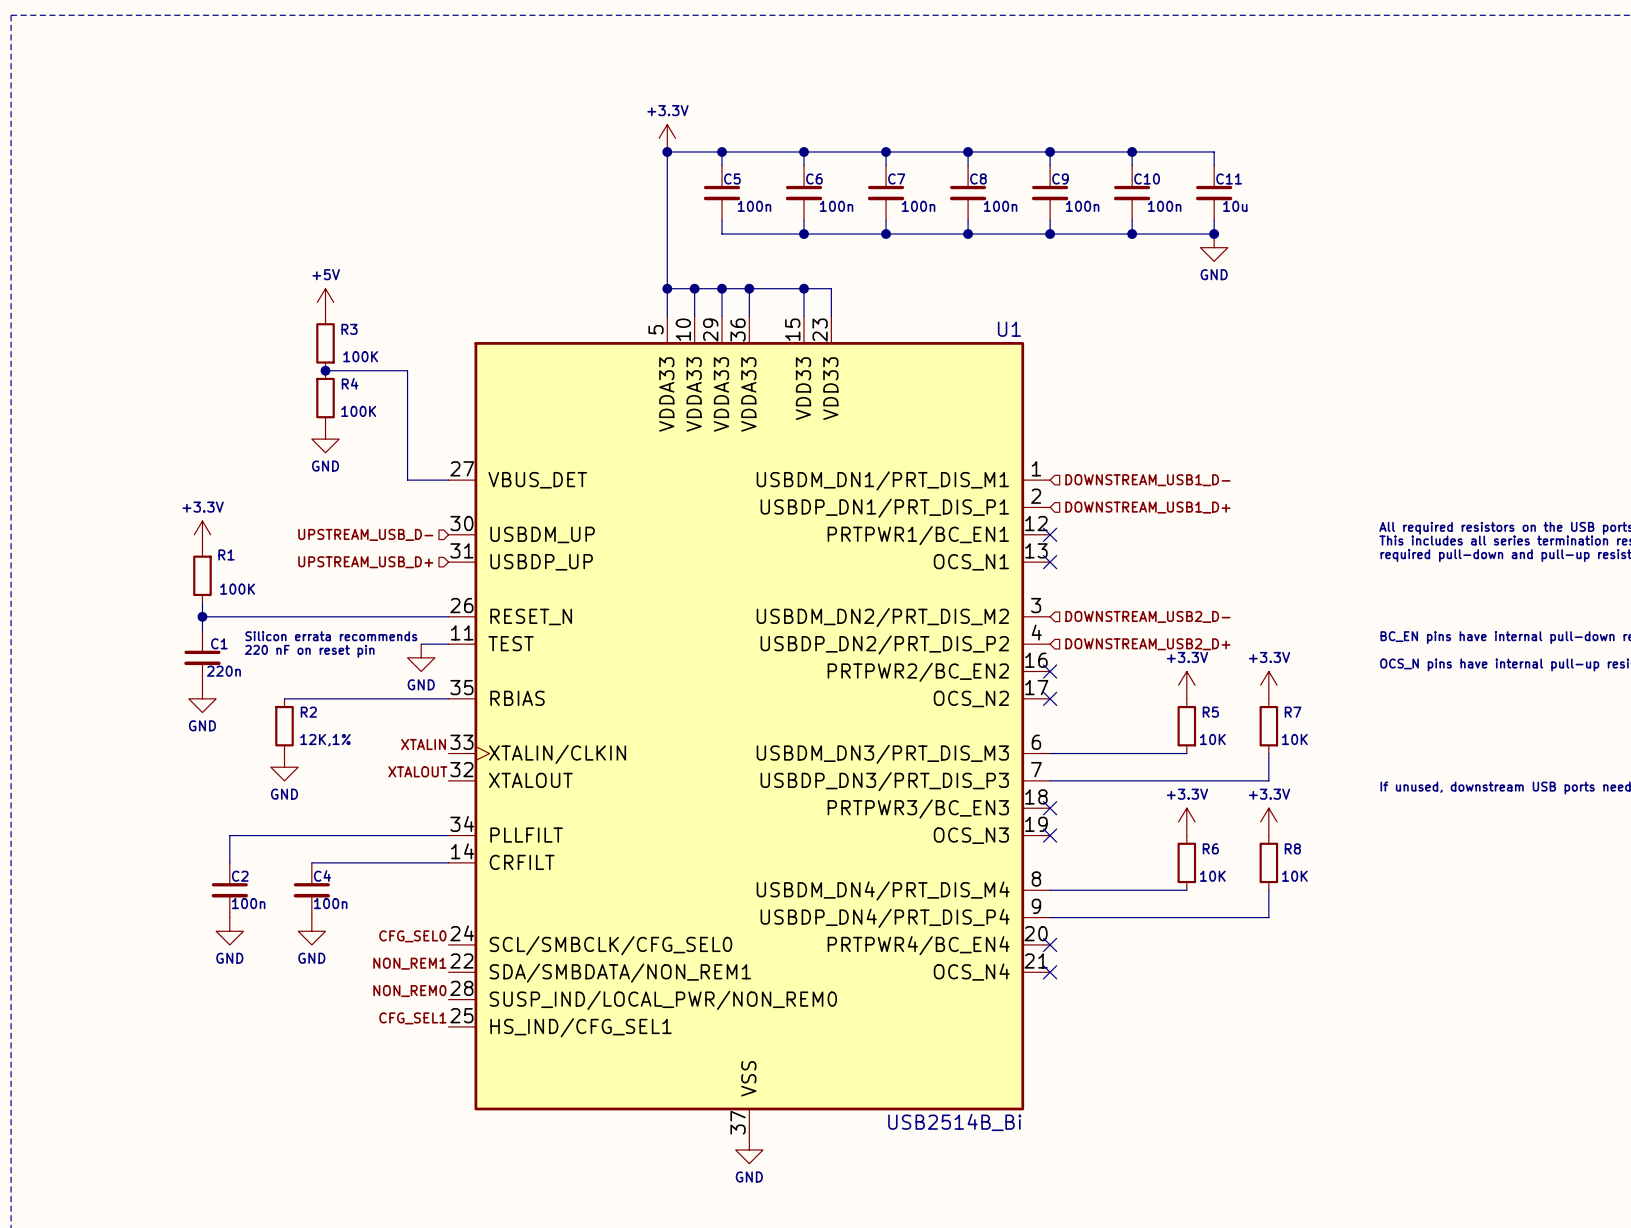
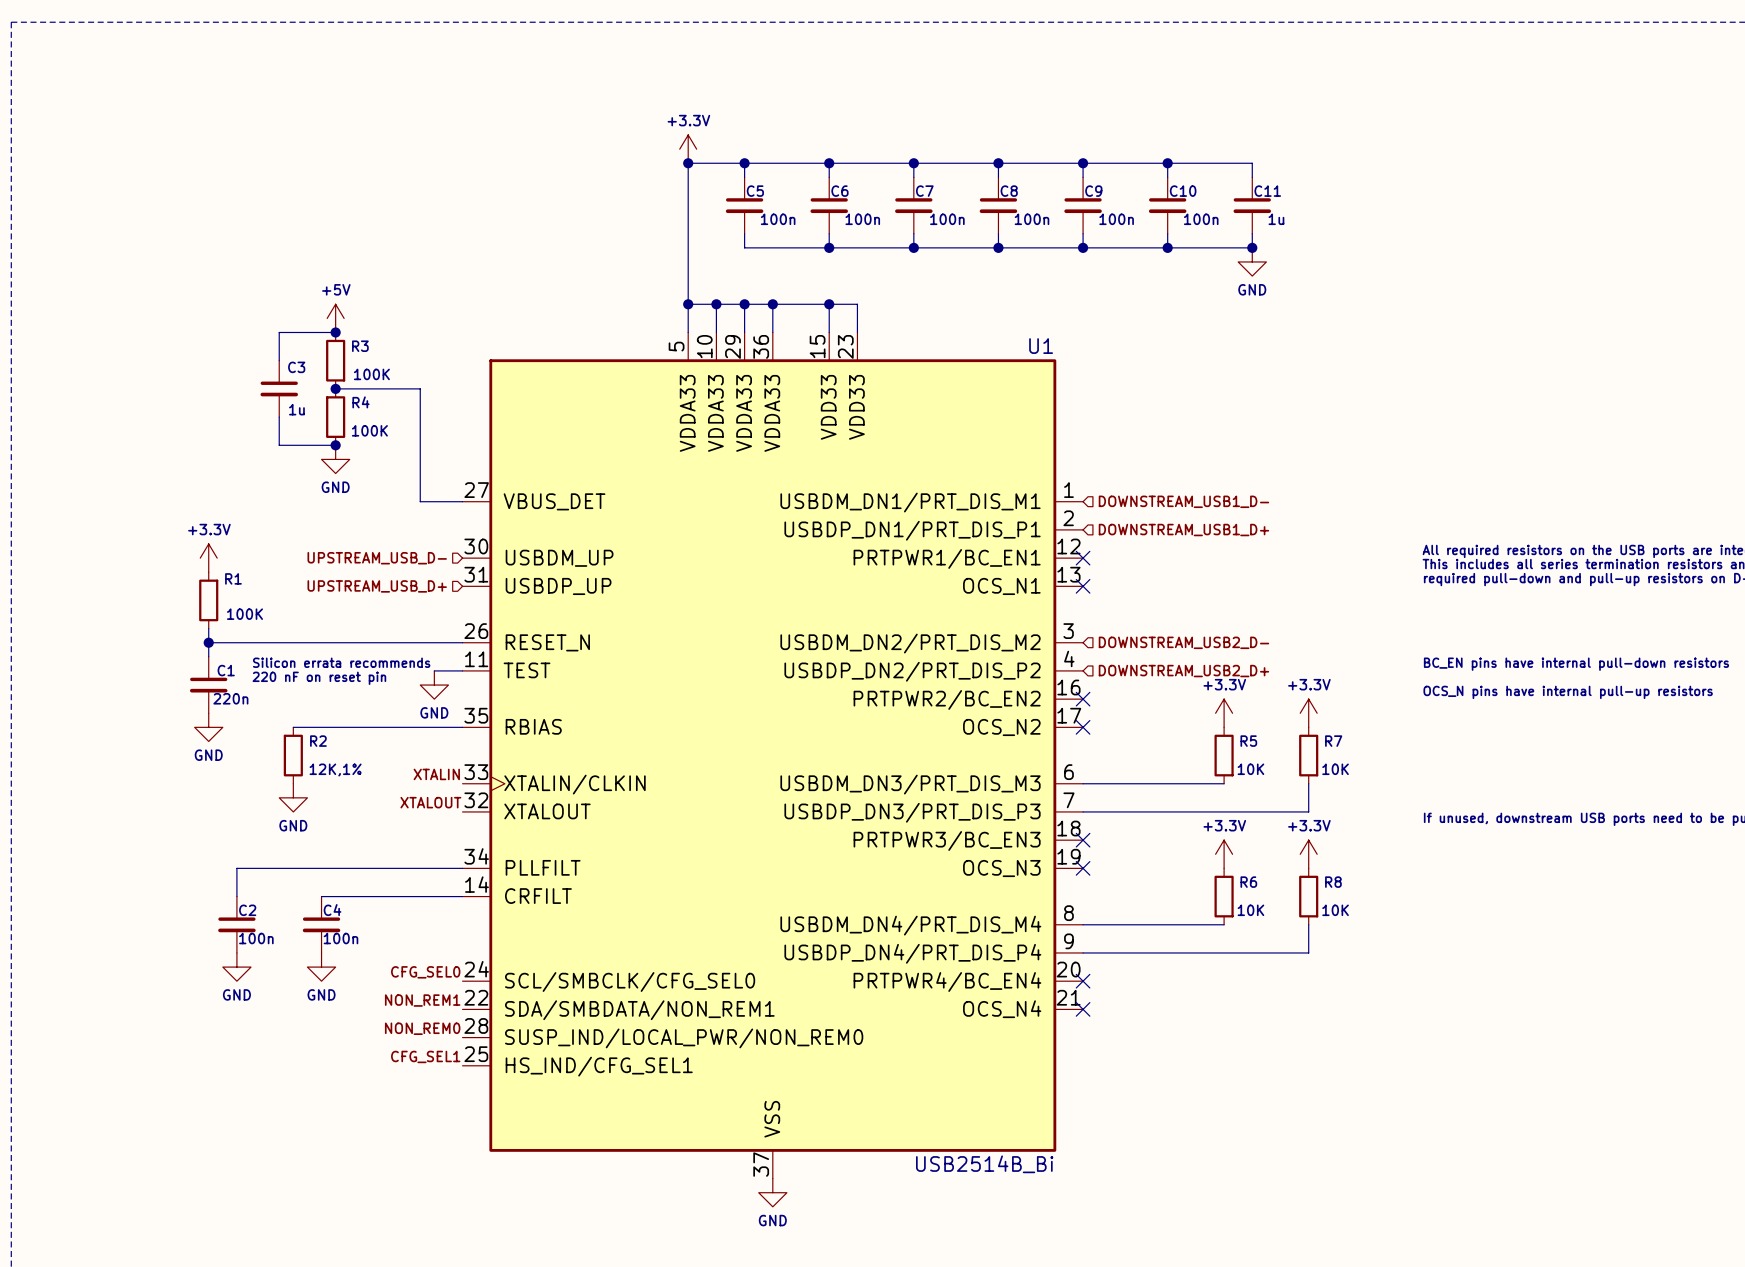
C11 value: 10u (1235, 206) -> 1u (1276, 219)
wire: none -> (335, 332) (279, 332) (279, 360)
junction: none -> (335, 332)
C3: none -> 1u (279, 388)
wire: none -> (279, 417) (279, 445) (335, 445)
junction: none -> (335, 445)

